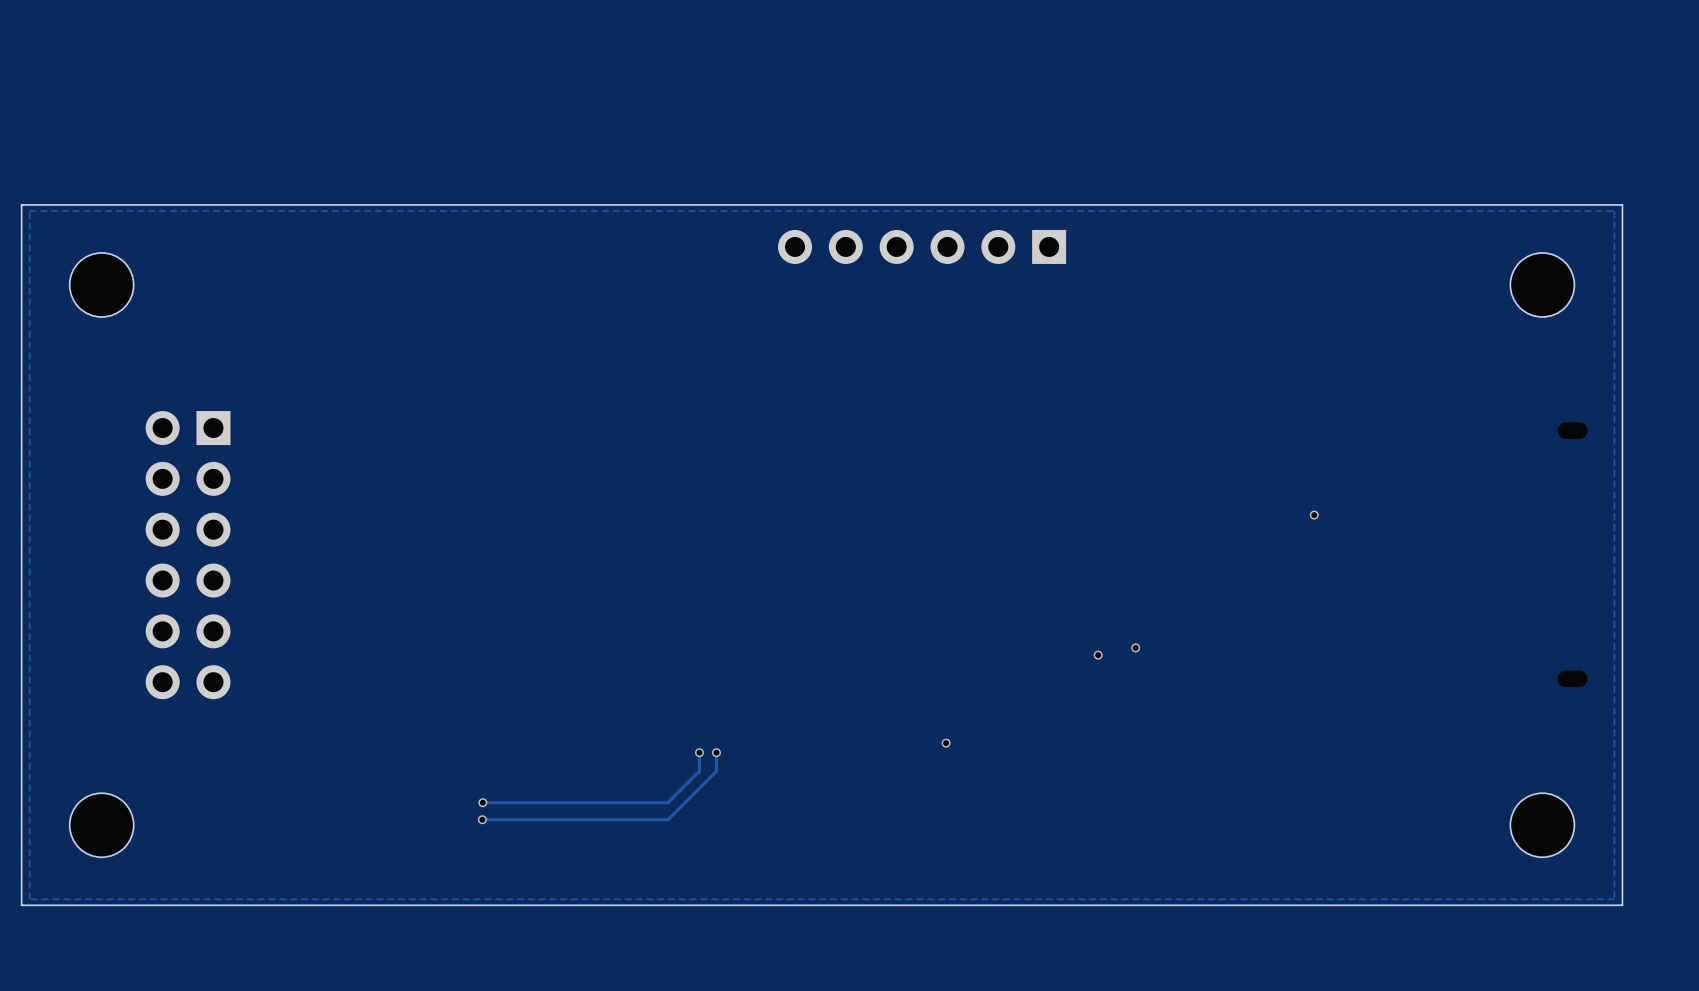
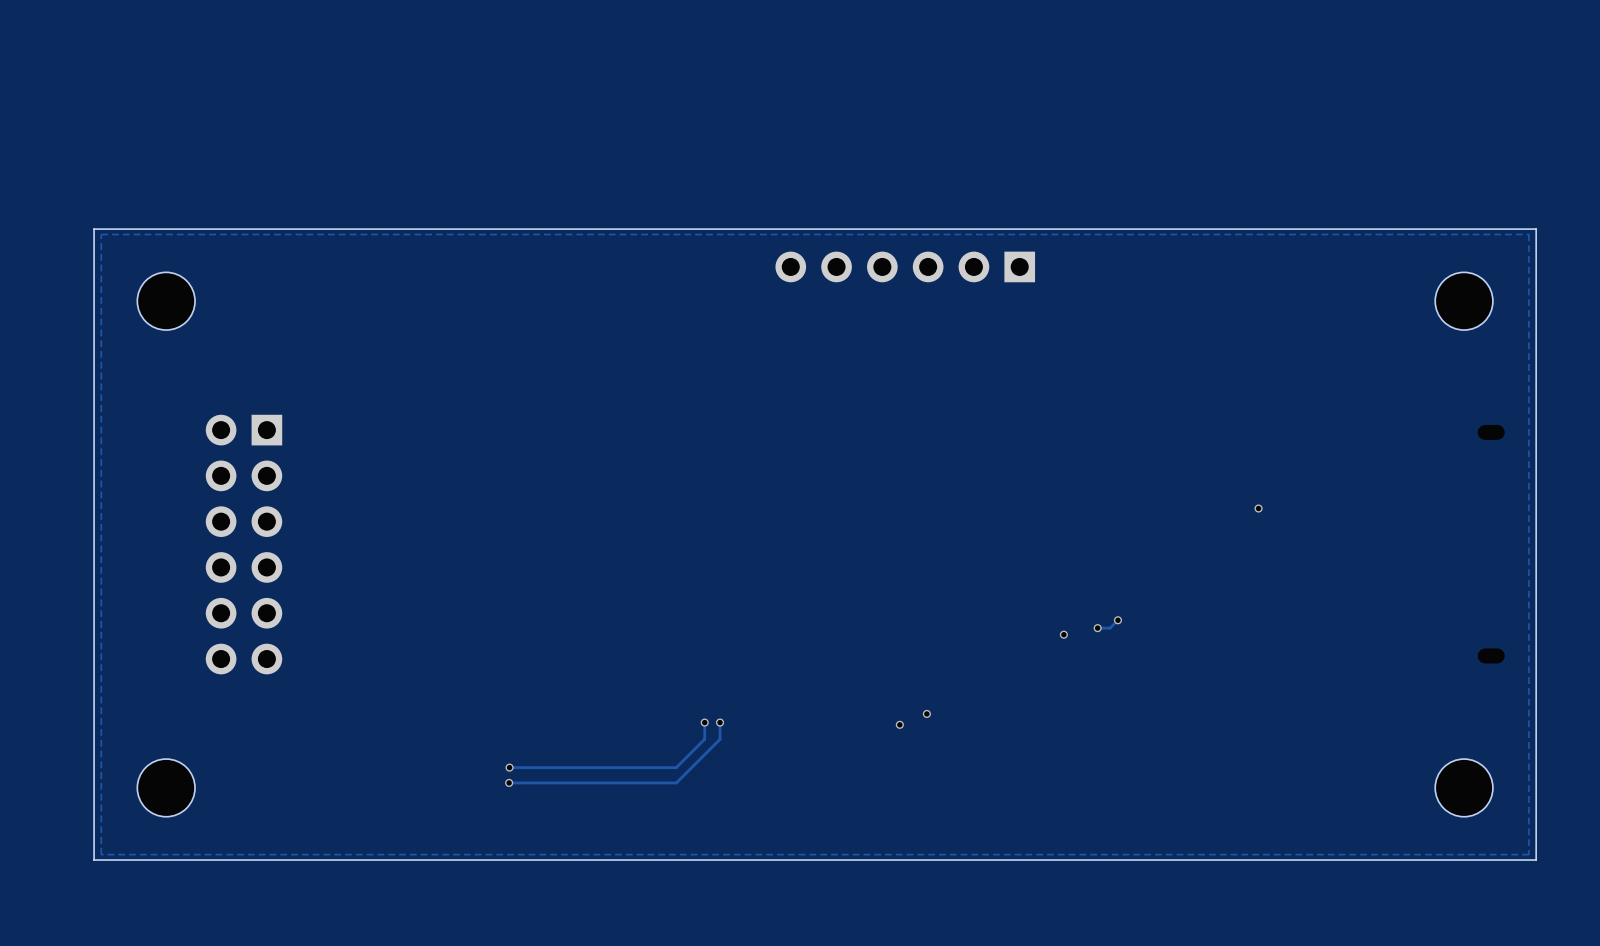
track: none -> (1117, 620) (1110, 628) (1097, 628)
via: none -> (1117, 620)
via: none -> (899, 724)

